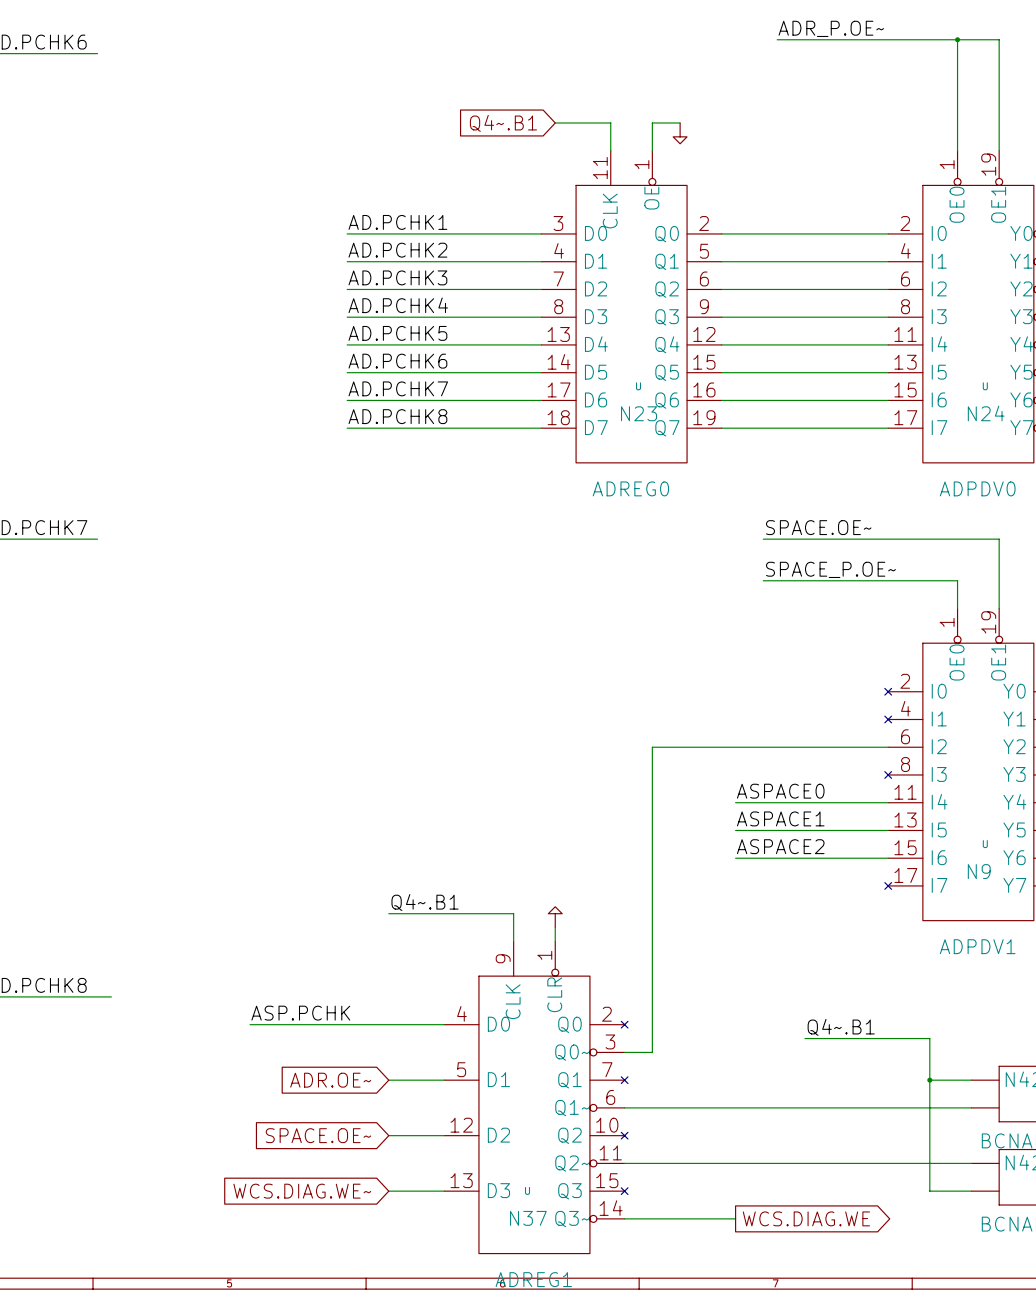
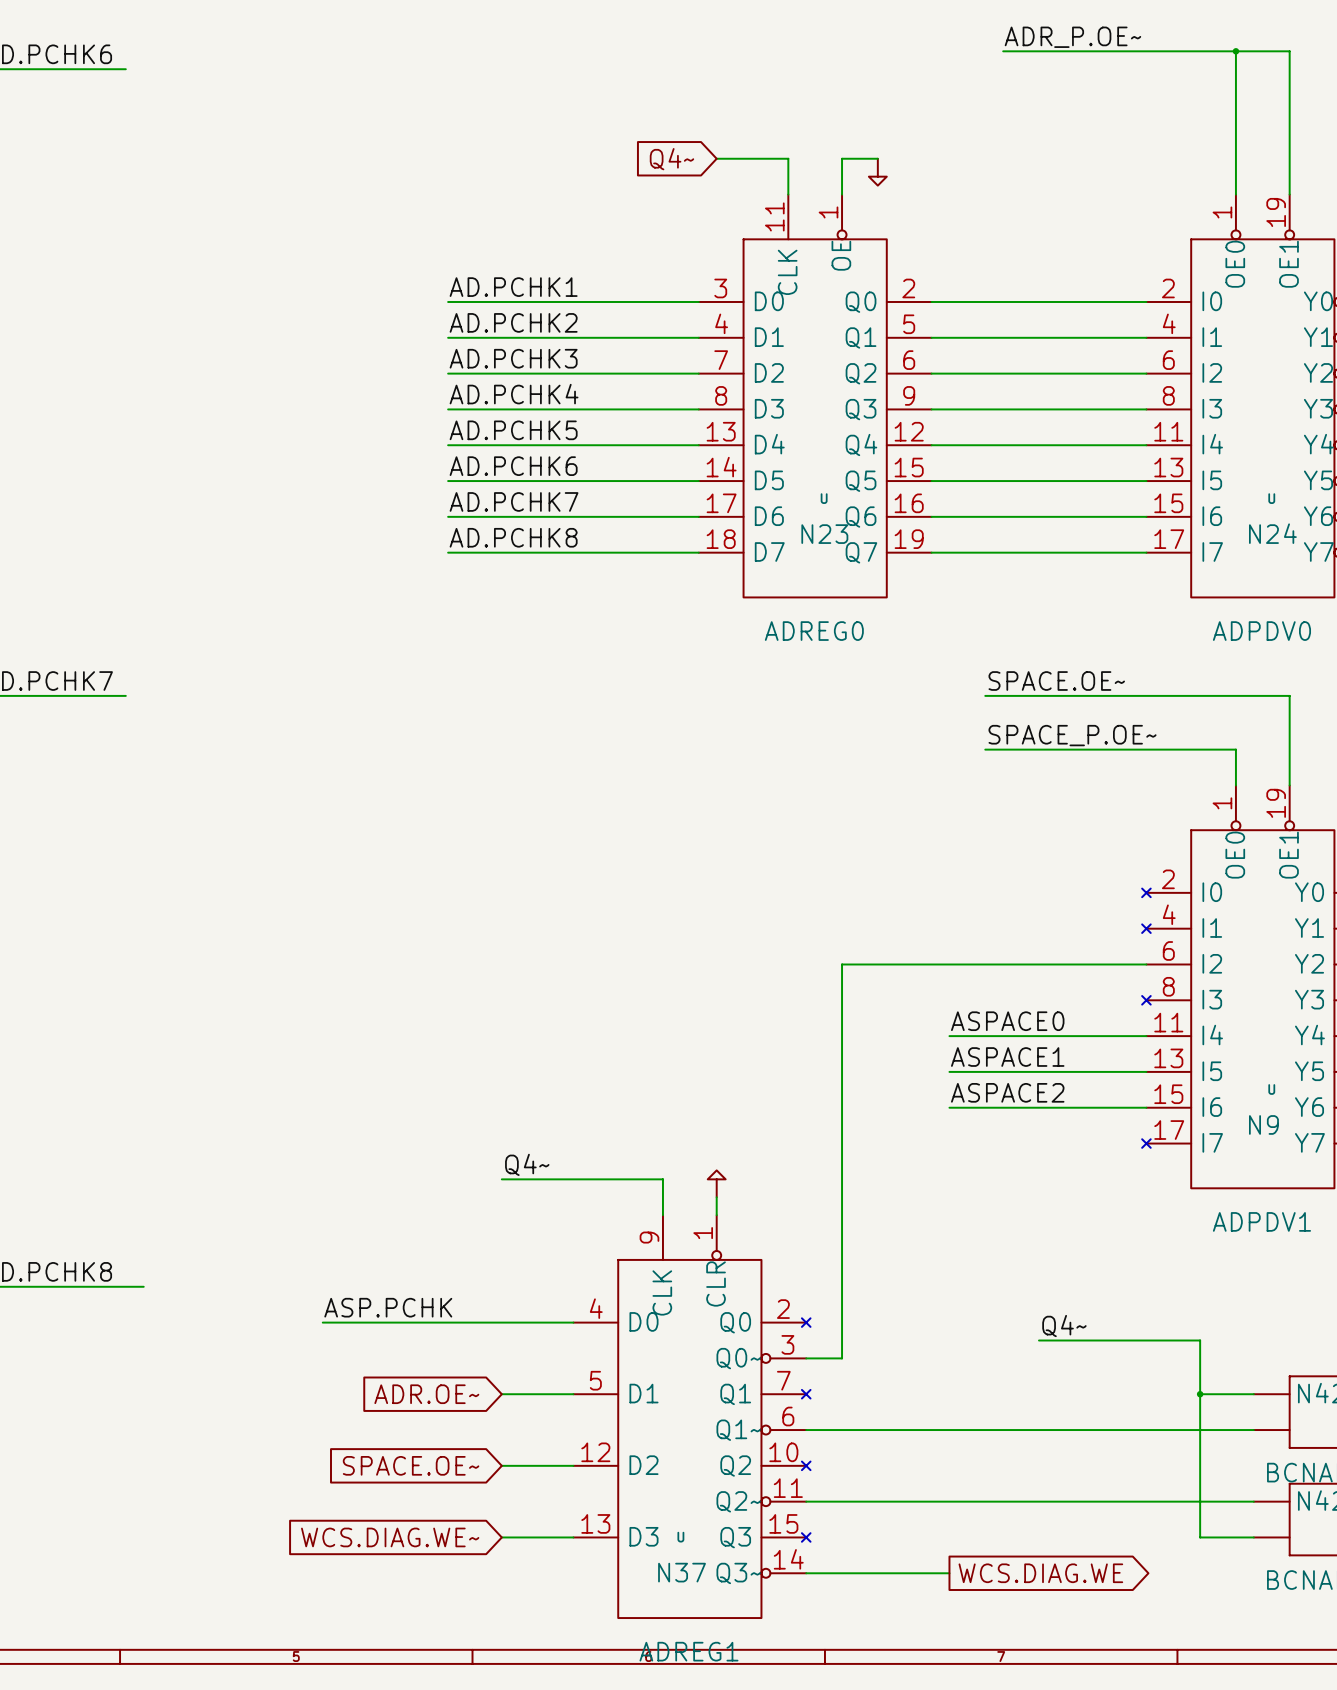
global label: Q4~.B1 (503, 123) -> Q4~ (671, 159)
label: Q4~.B1 (425, 902) -> Q4~ (527, 1164)
label: Q4~.B1 (841, 1027) -> Q4~ (1064, 1326)

